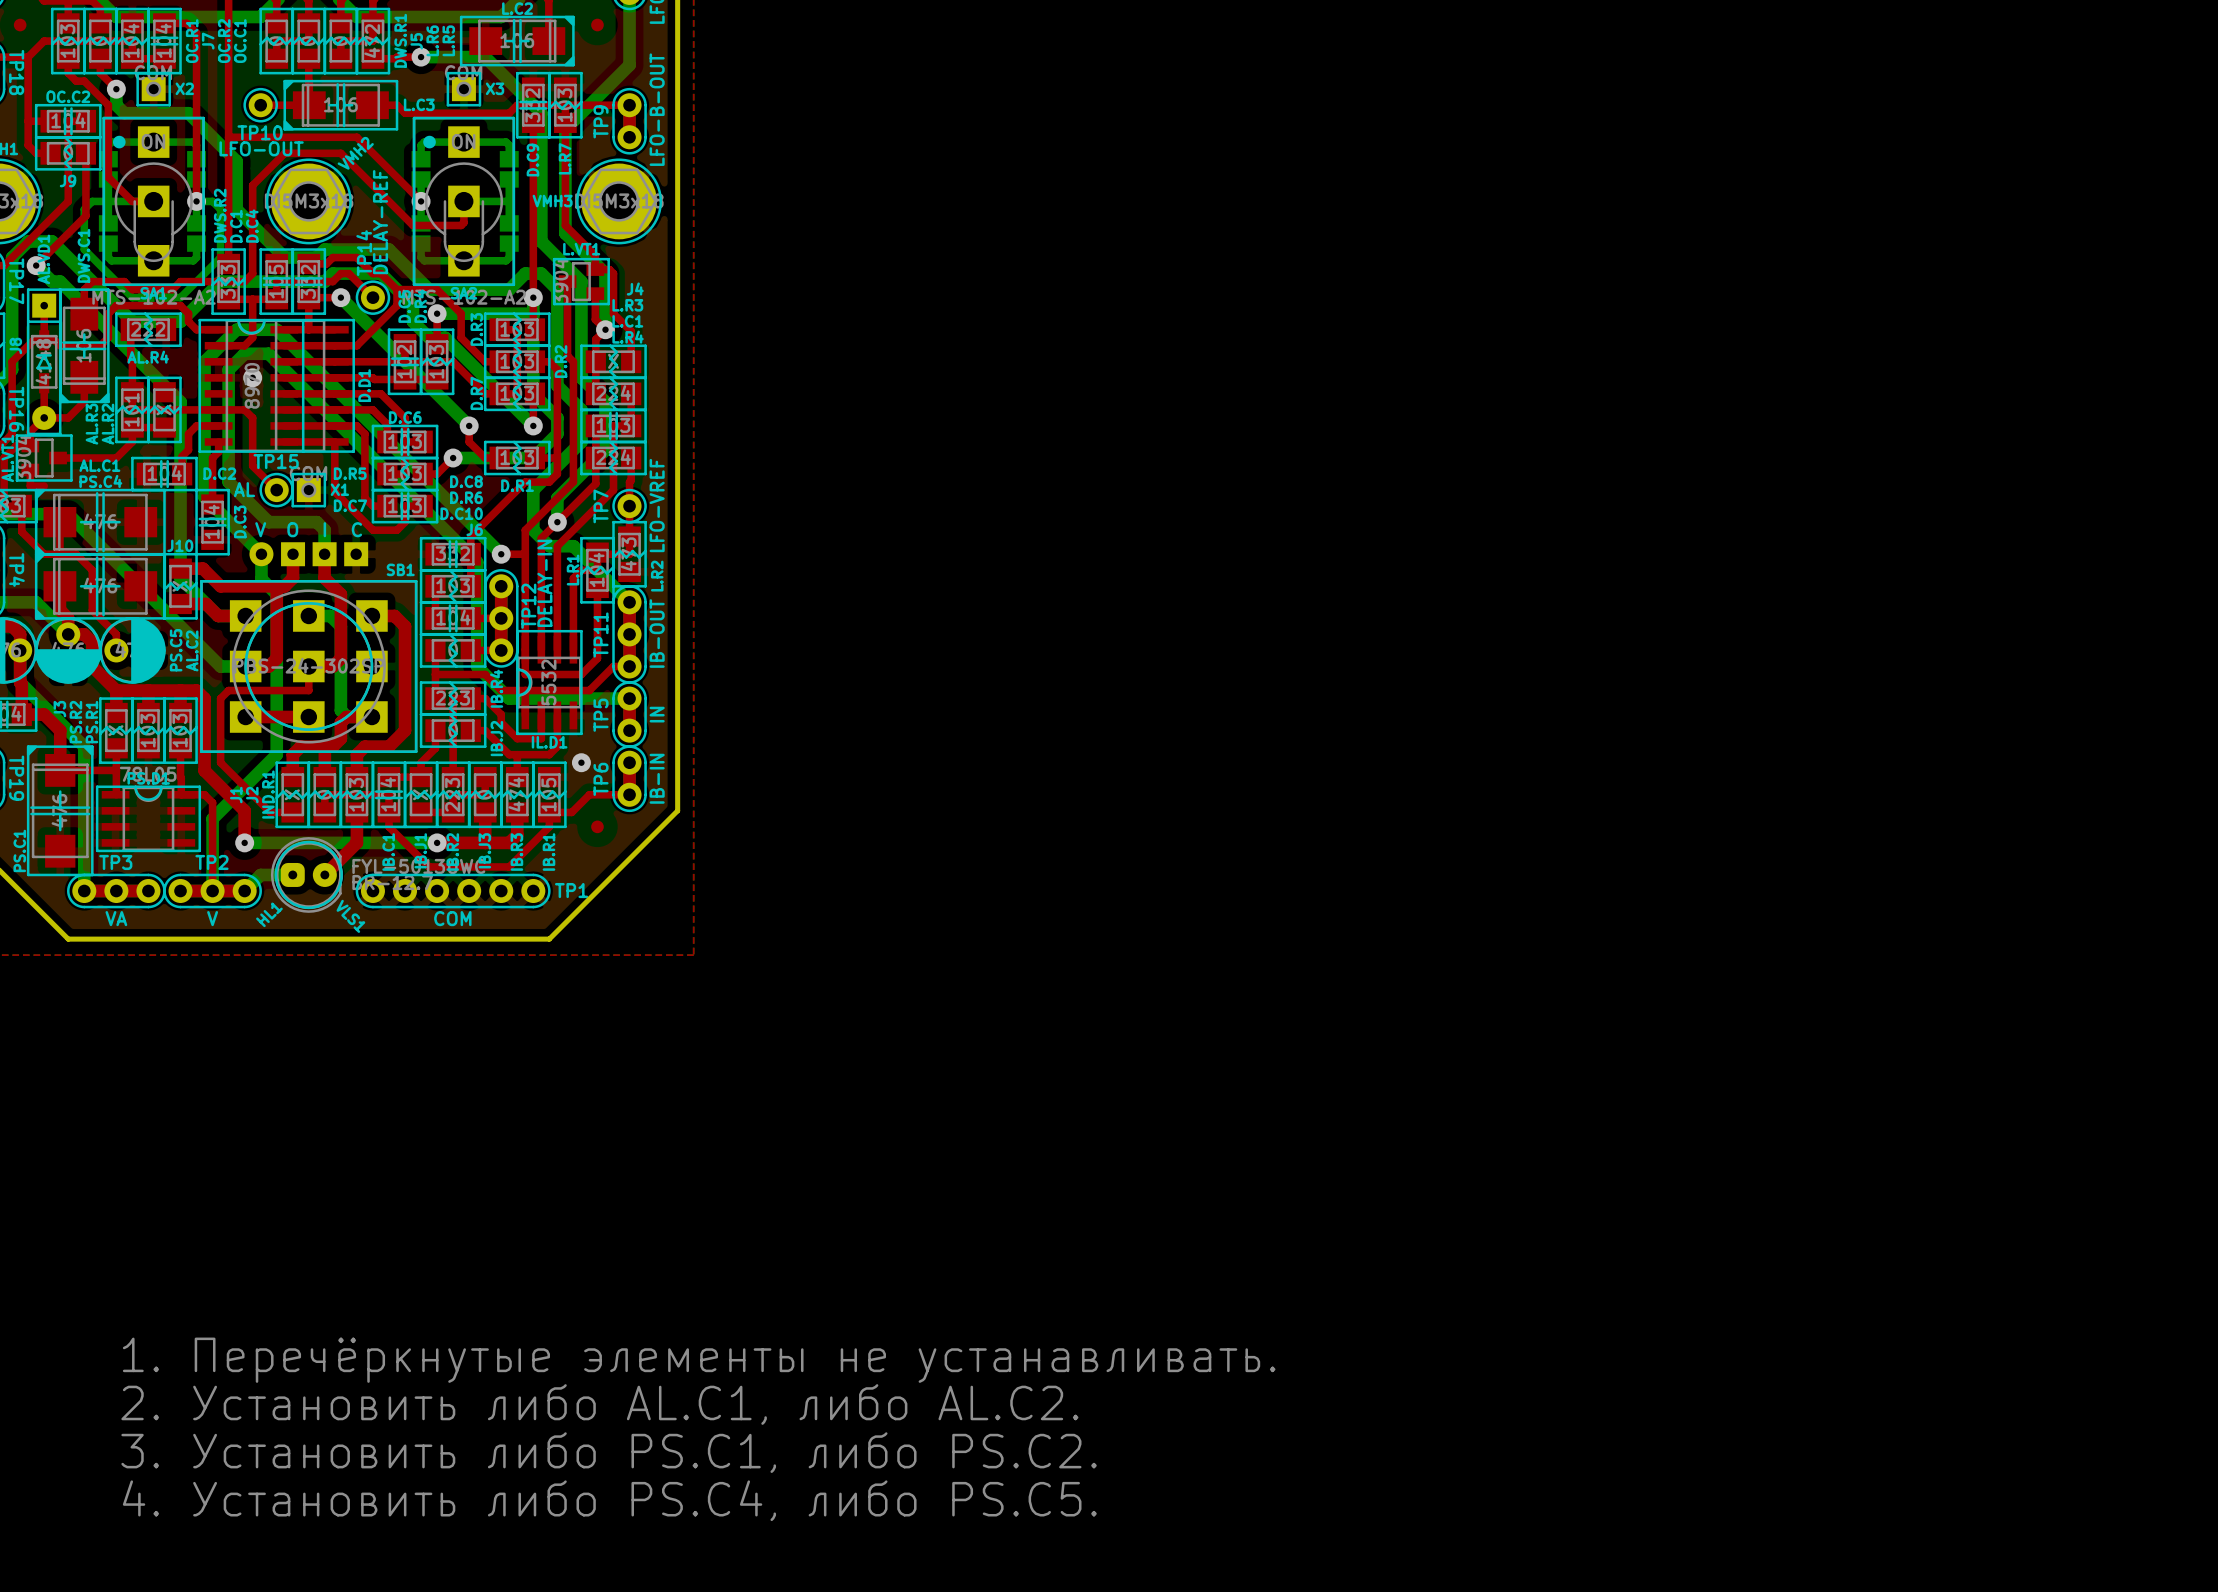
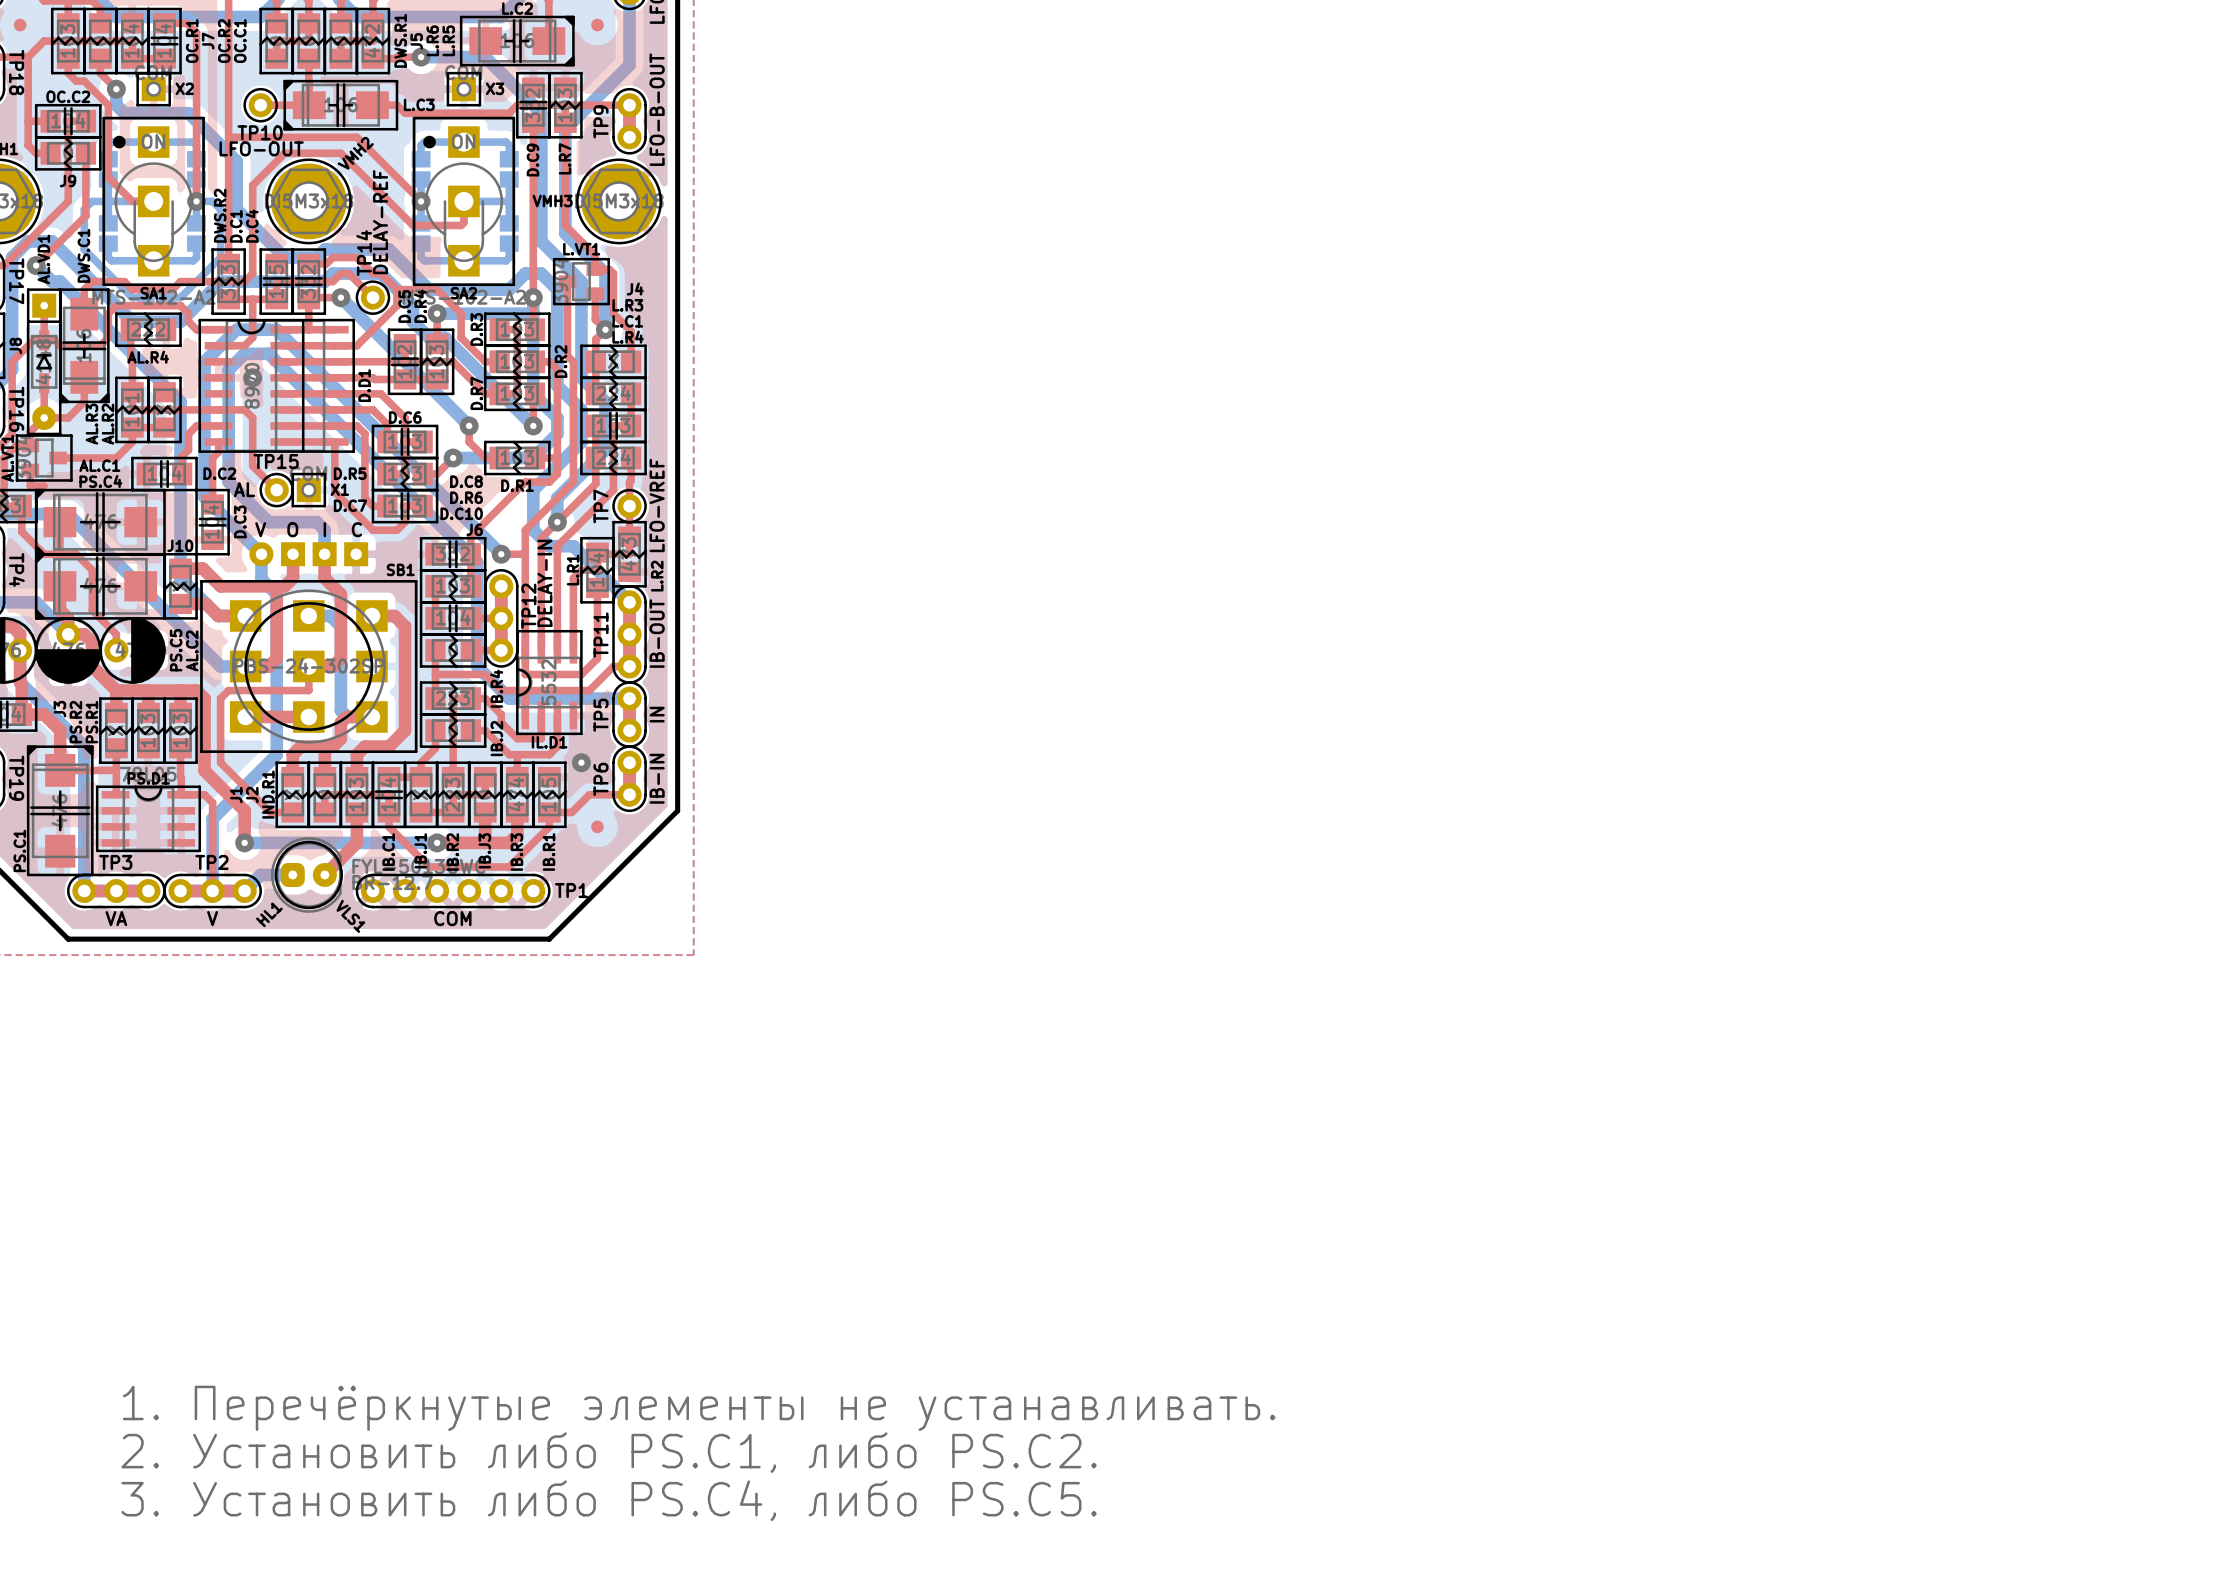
text: 1. Перечёркнутые элементы не устанавливать. (699, 1360) -> none
text: 2. Установить либо AL.C1, либо AL.C2. (599, 1404) -> 1. Перечёркнутые элементы не устанавливать. (699, 1408)
text: 3. Установить либо PS.C1, либо PS.C2. (609, 1452) -> 2. Установить либо PS.C1, либо PS.C2. (609, 1452)
text: 4. Установить либо PS.C4, либо PS.C5. (609, 1500) -> 3. Установить либо PS.C4, либо PS.C5. (609, 1500)

